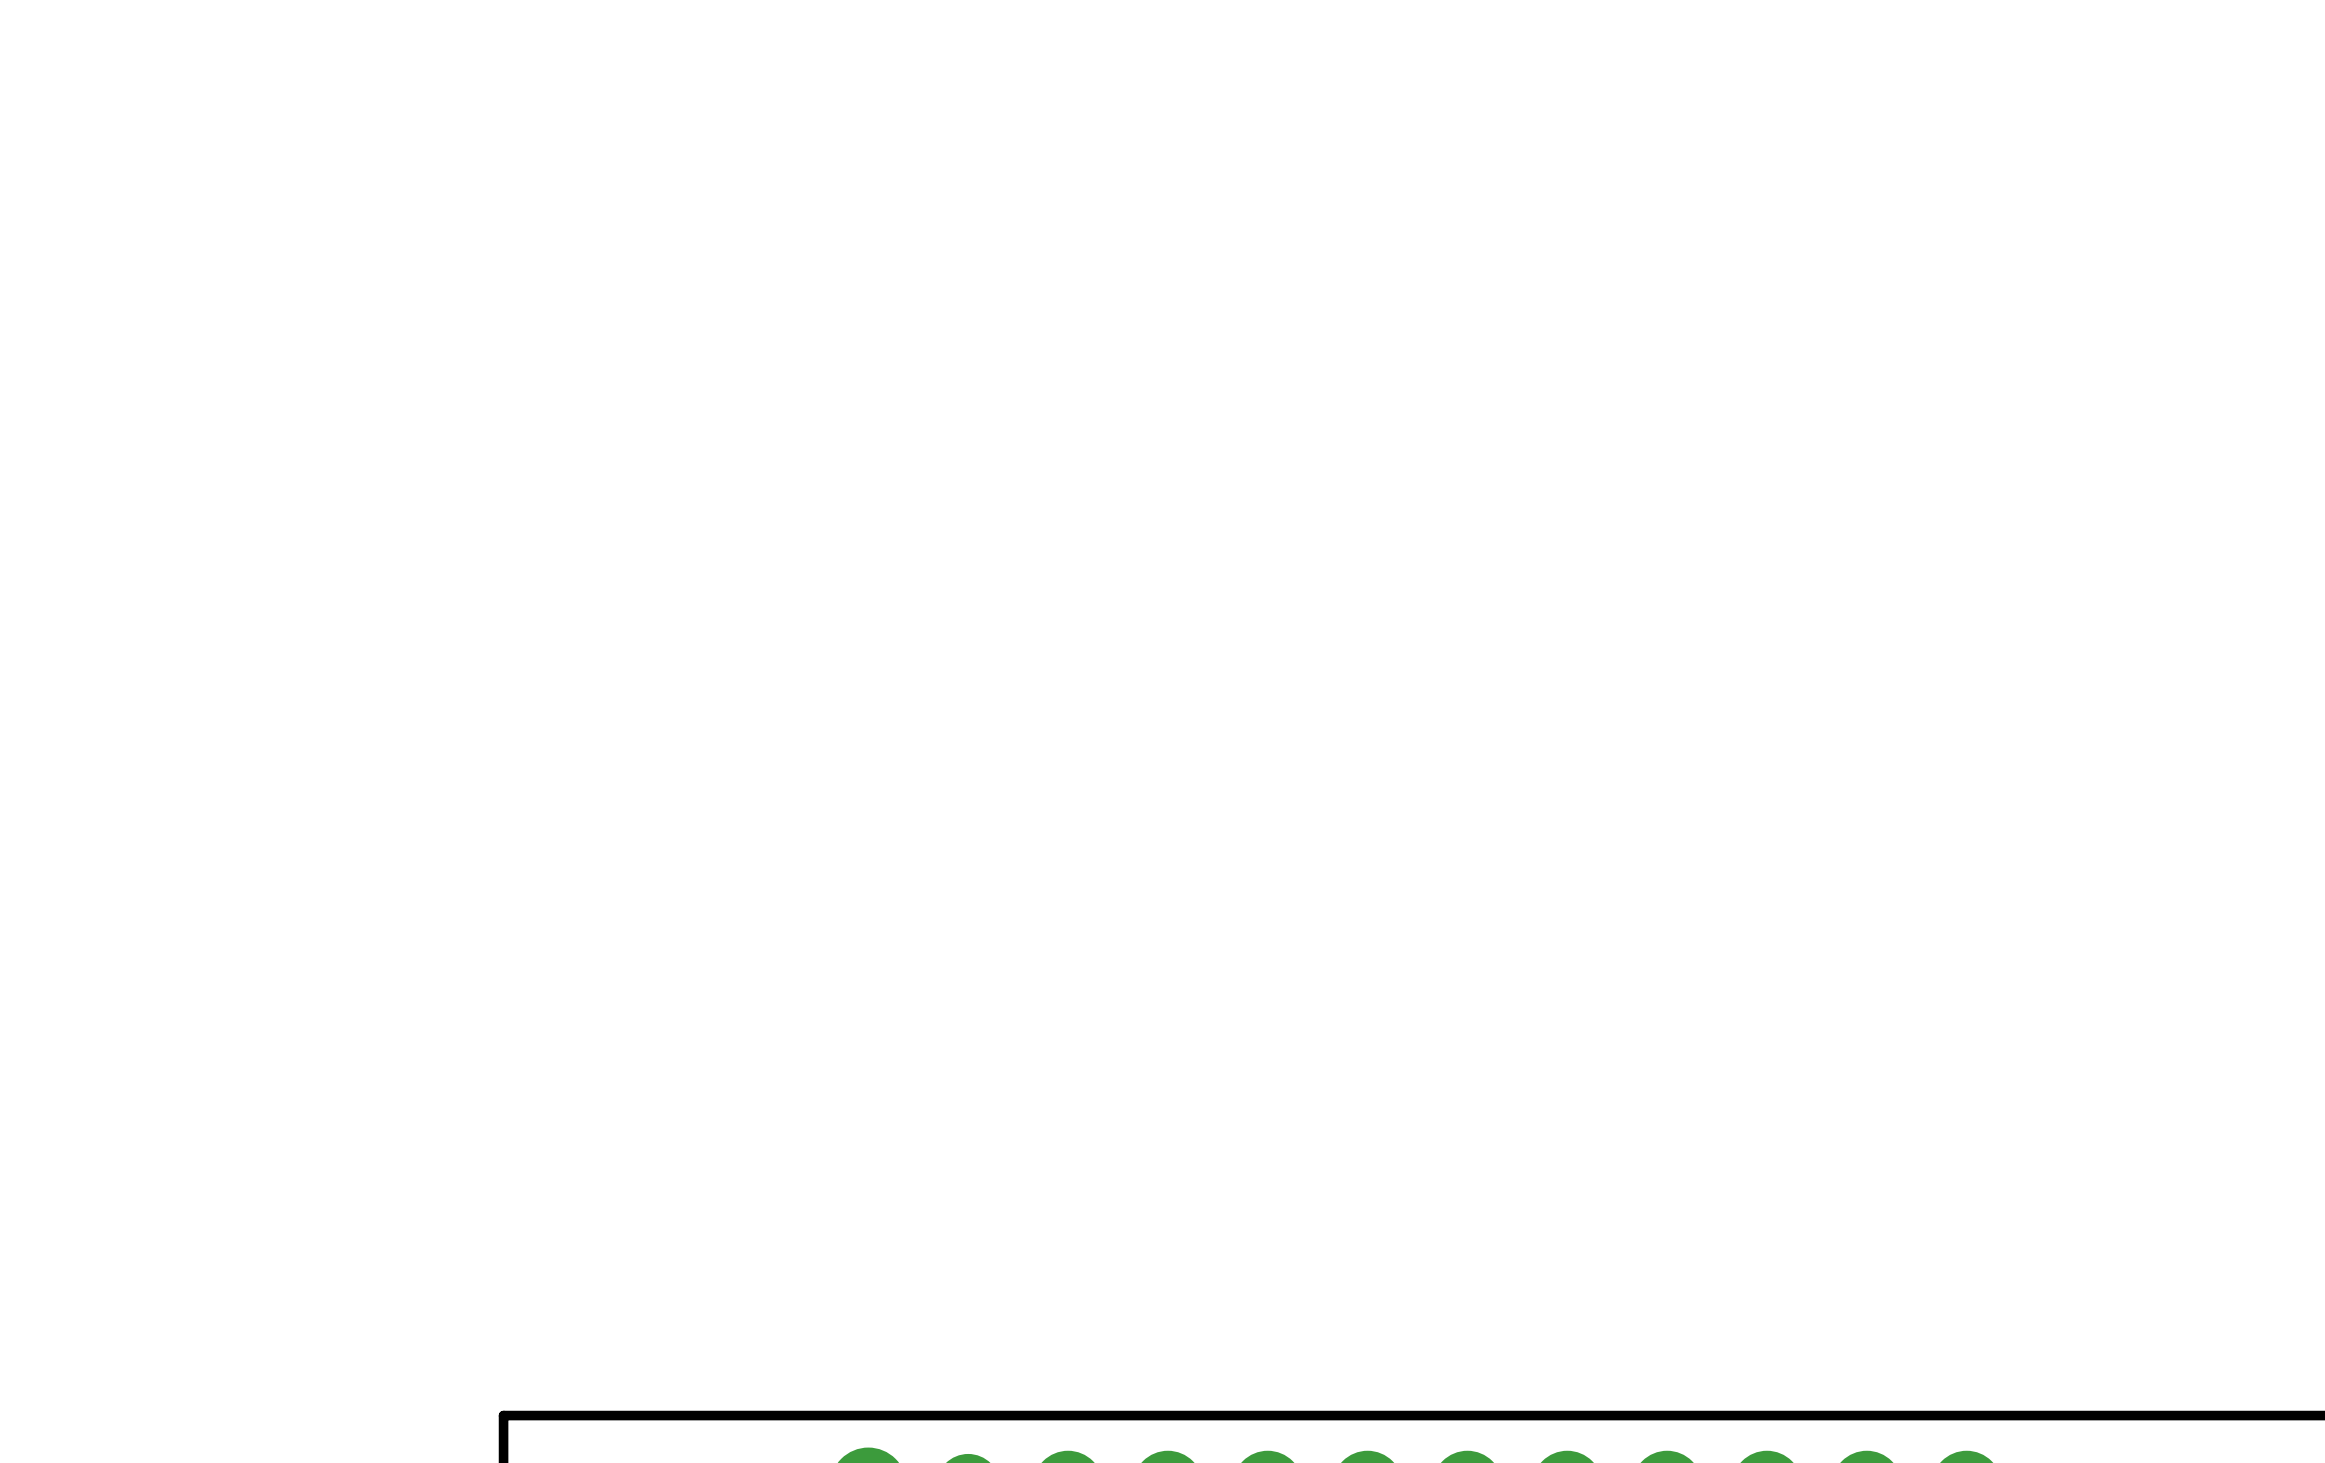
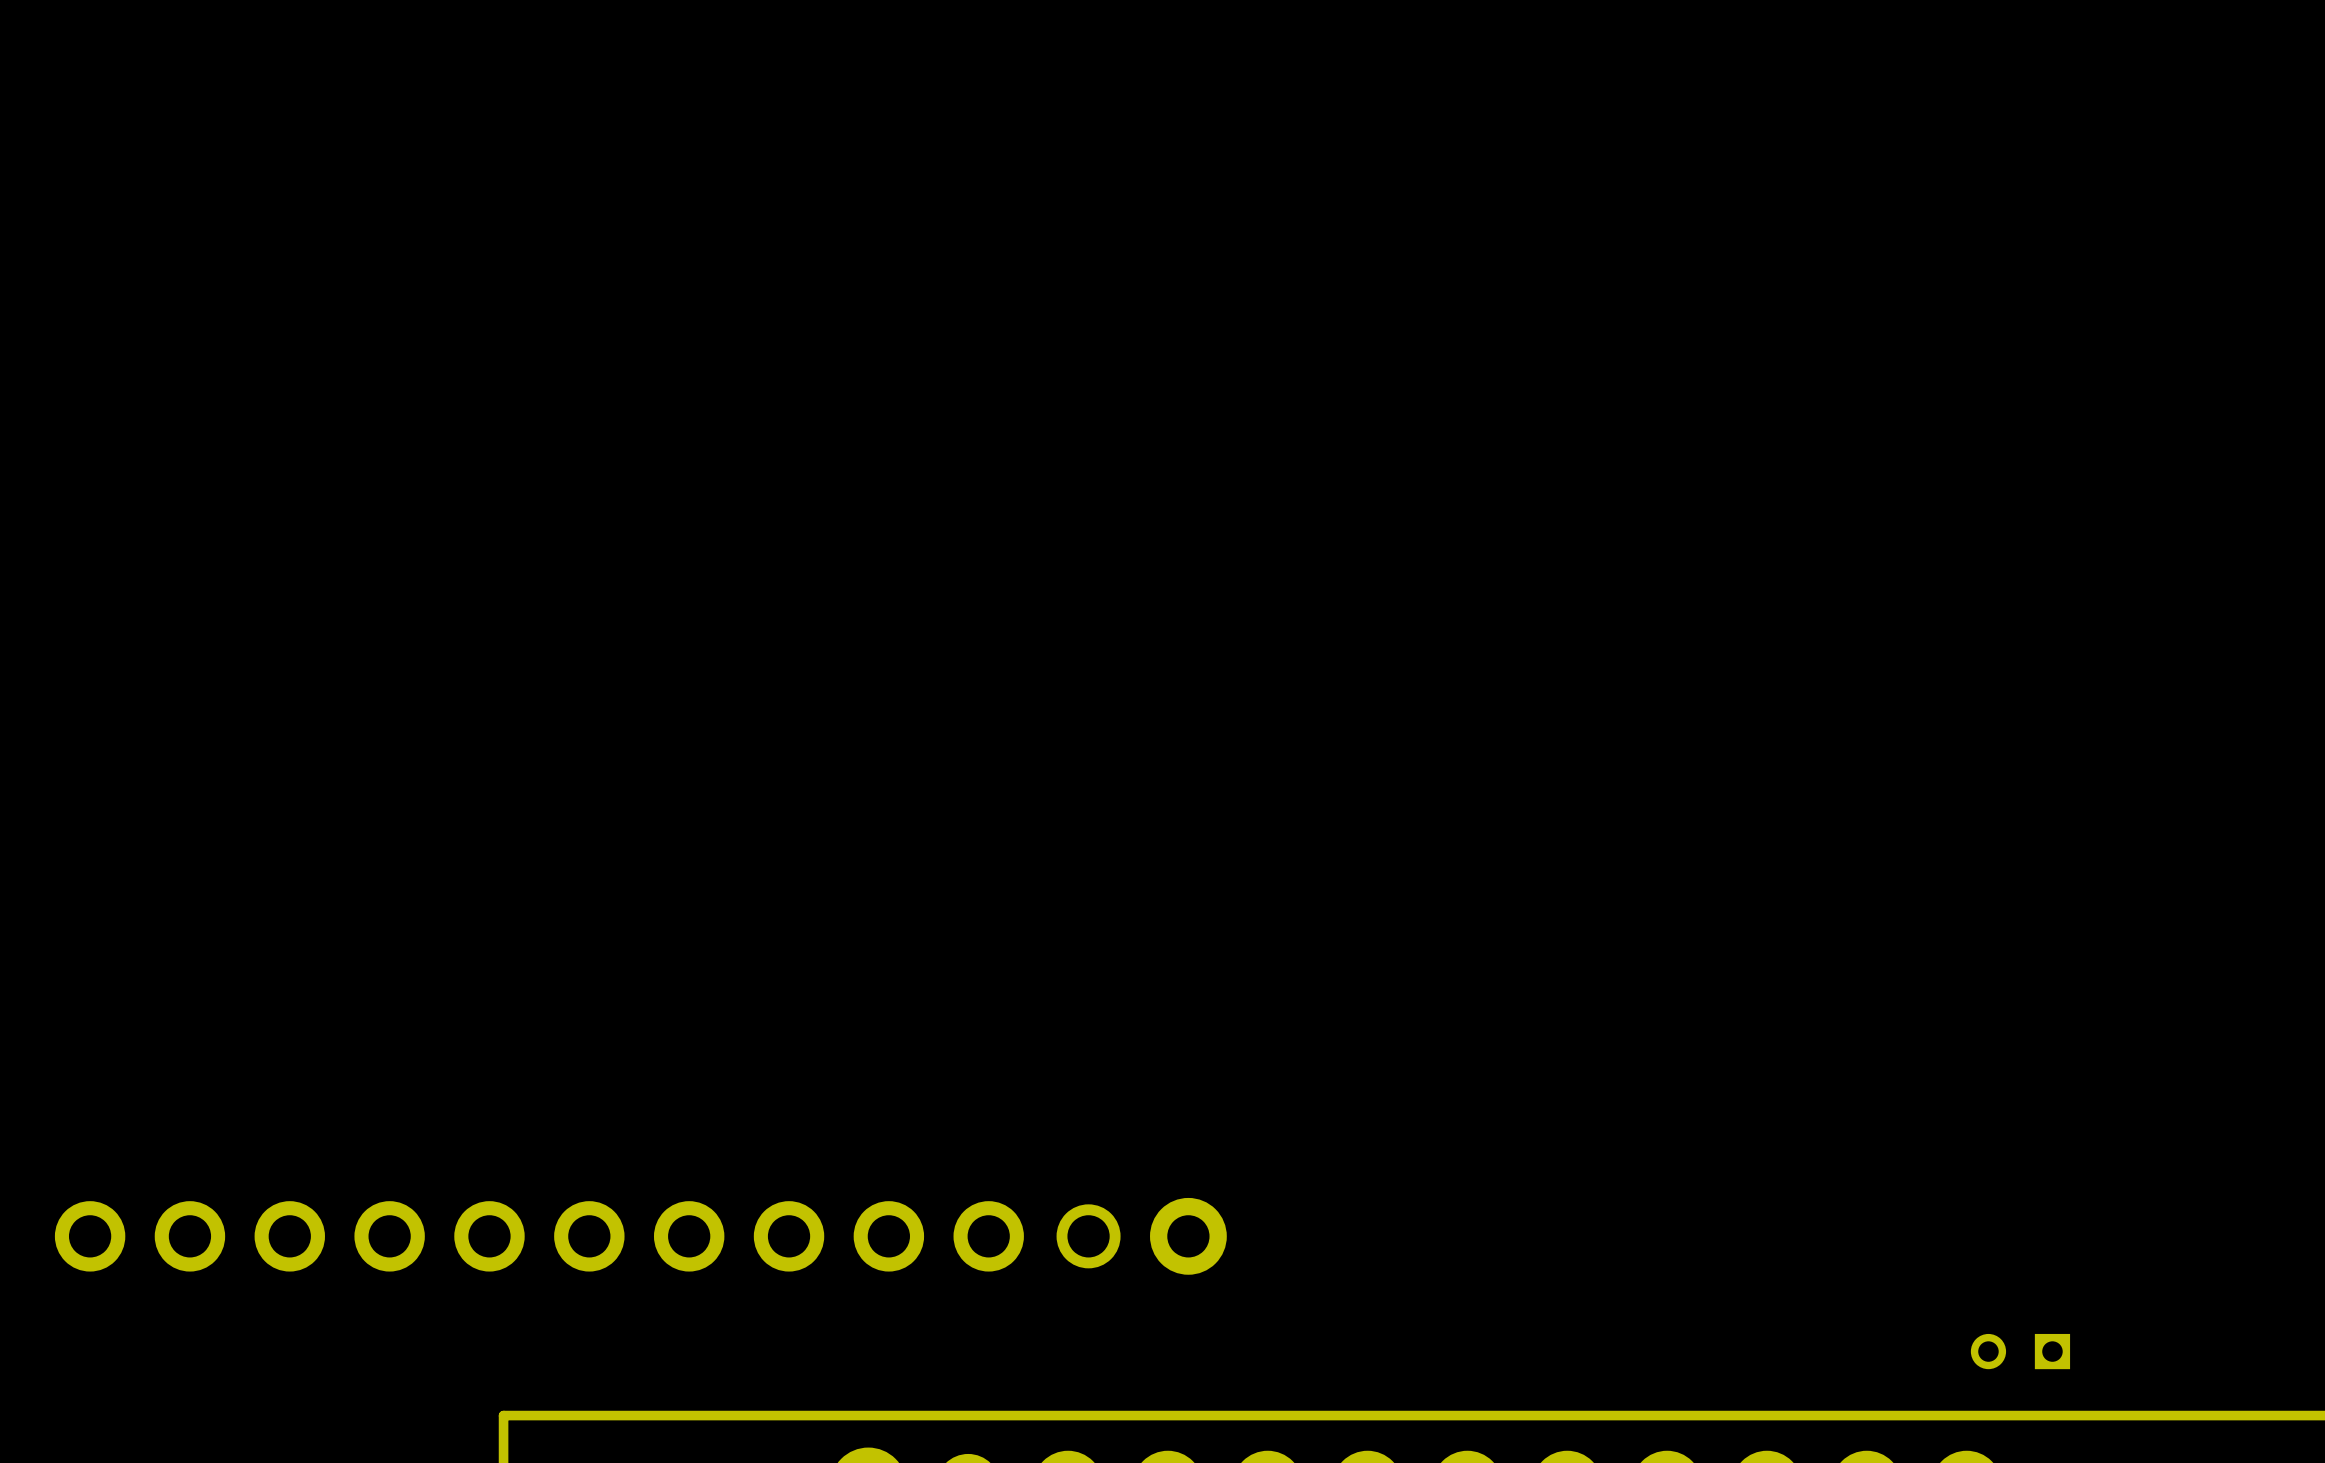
part: none -> (640, 1236)
part: none -> (2020, 1351)

